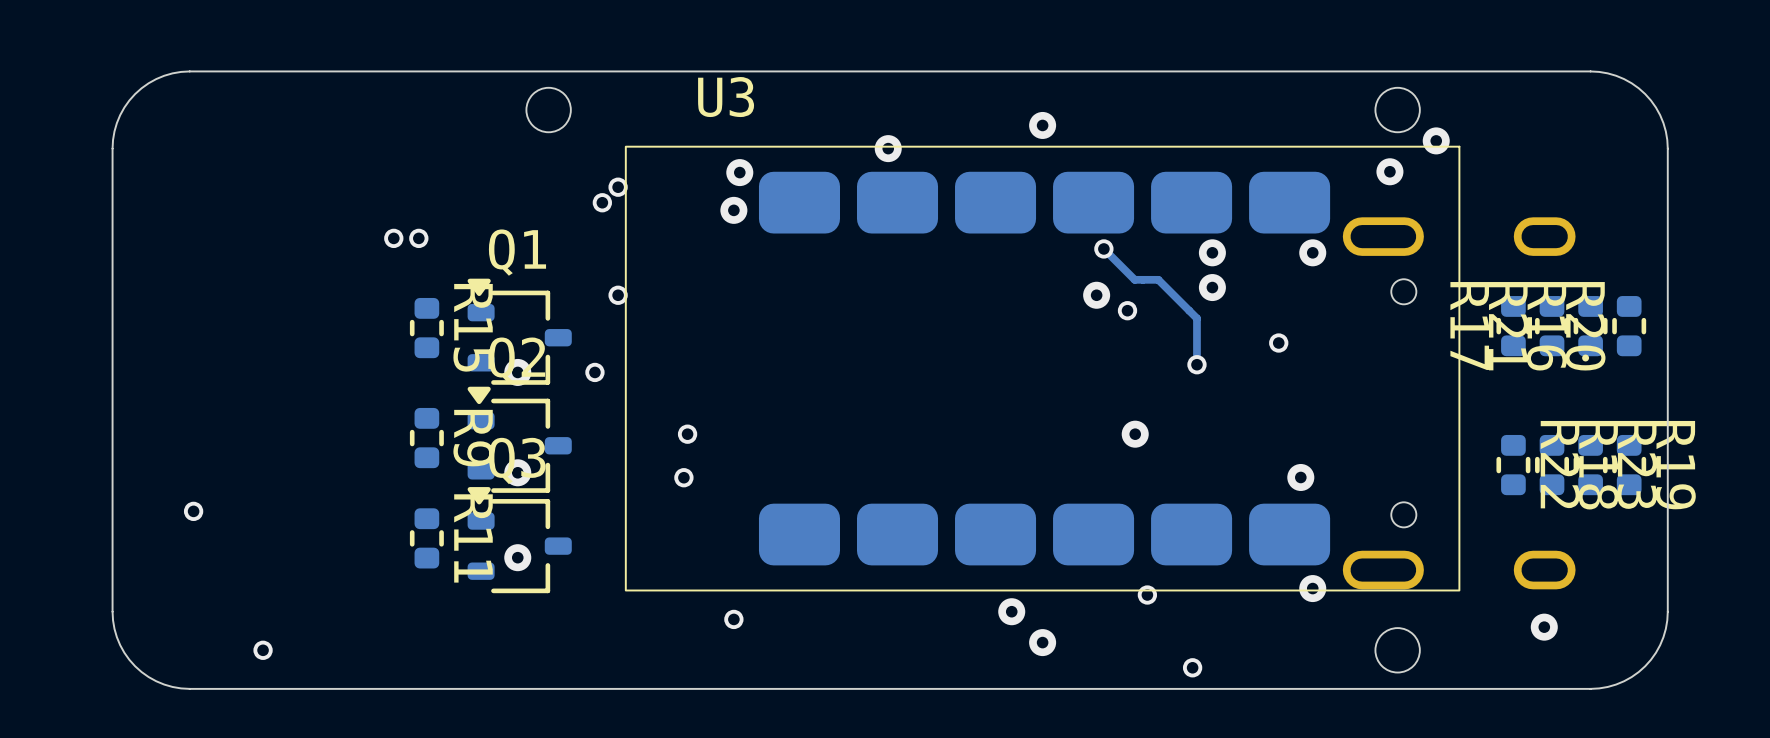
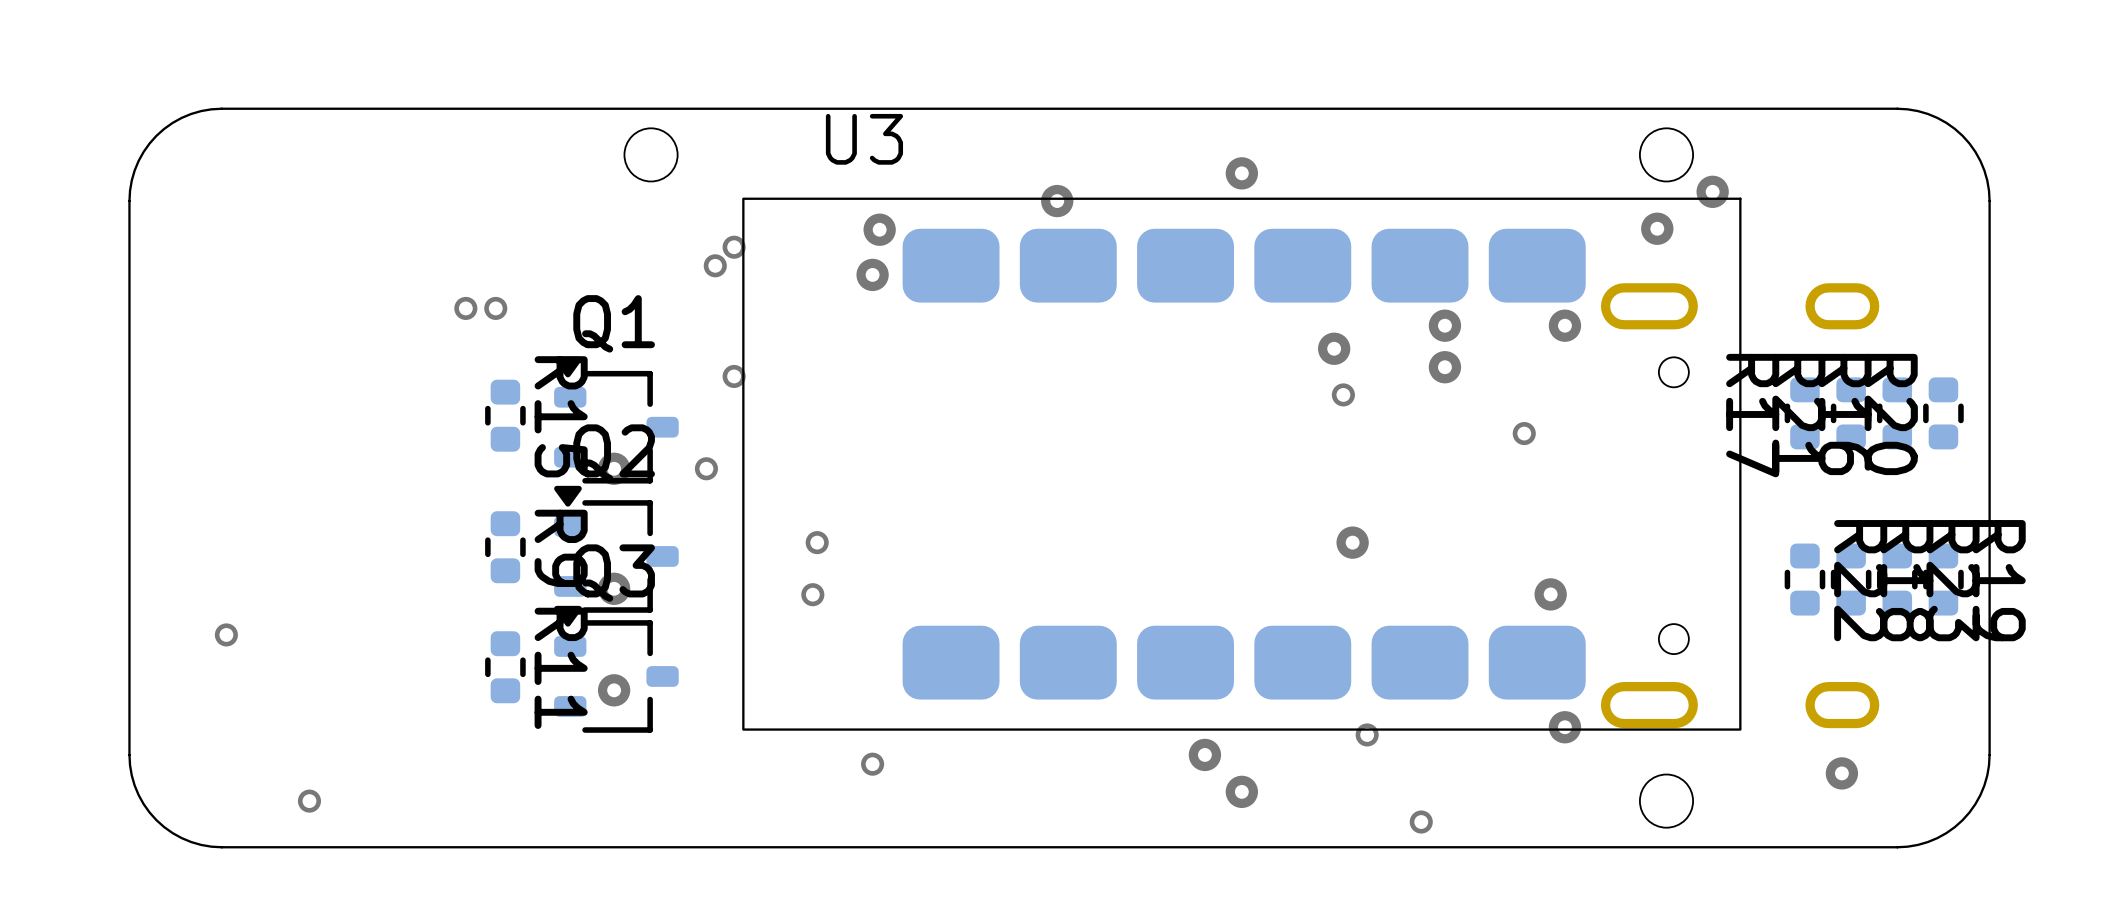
track: (1103, 248) (1134, 279) (1158, 279) (1196, 318) (1196, 364) -> none
via: (1103, 248) -> none
via position: (1096, 295) -> (1334, 348)
via: (1196, 364) -> none

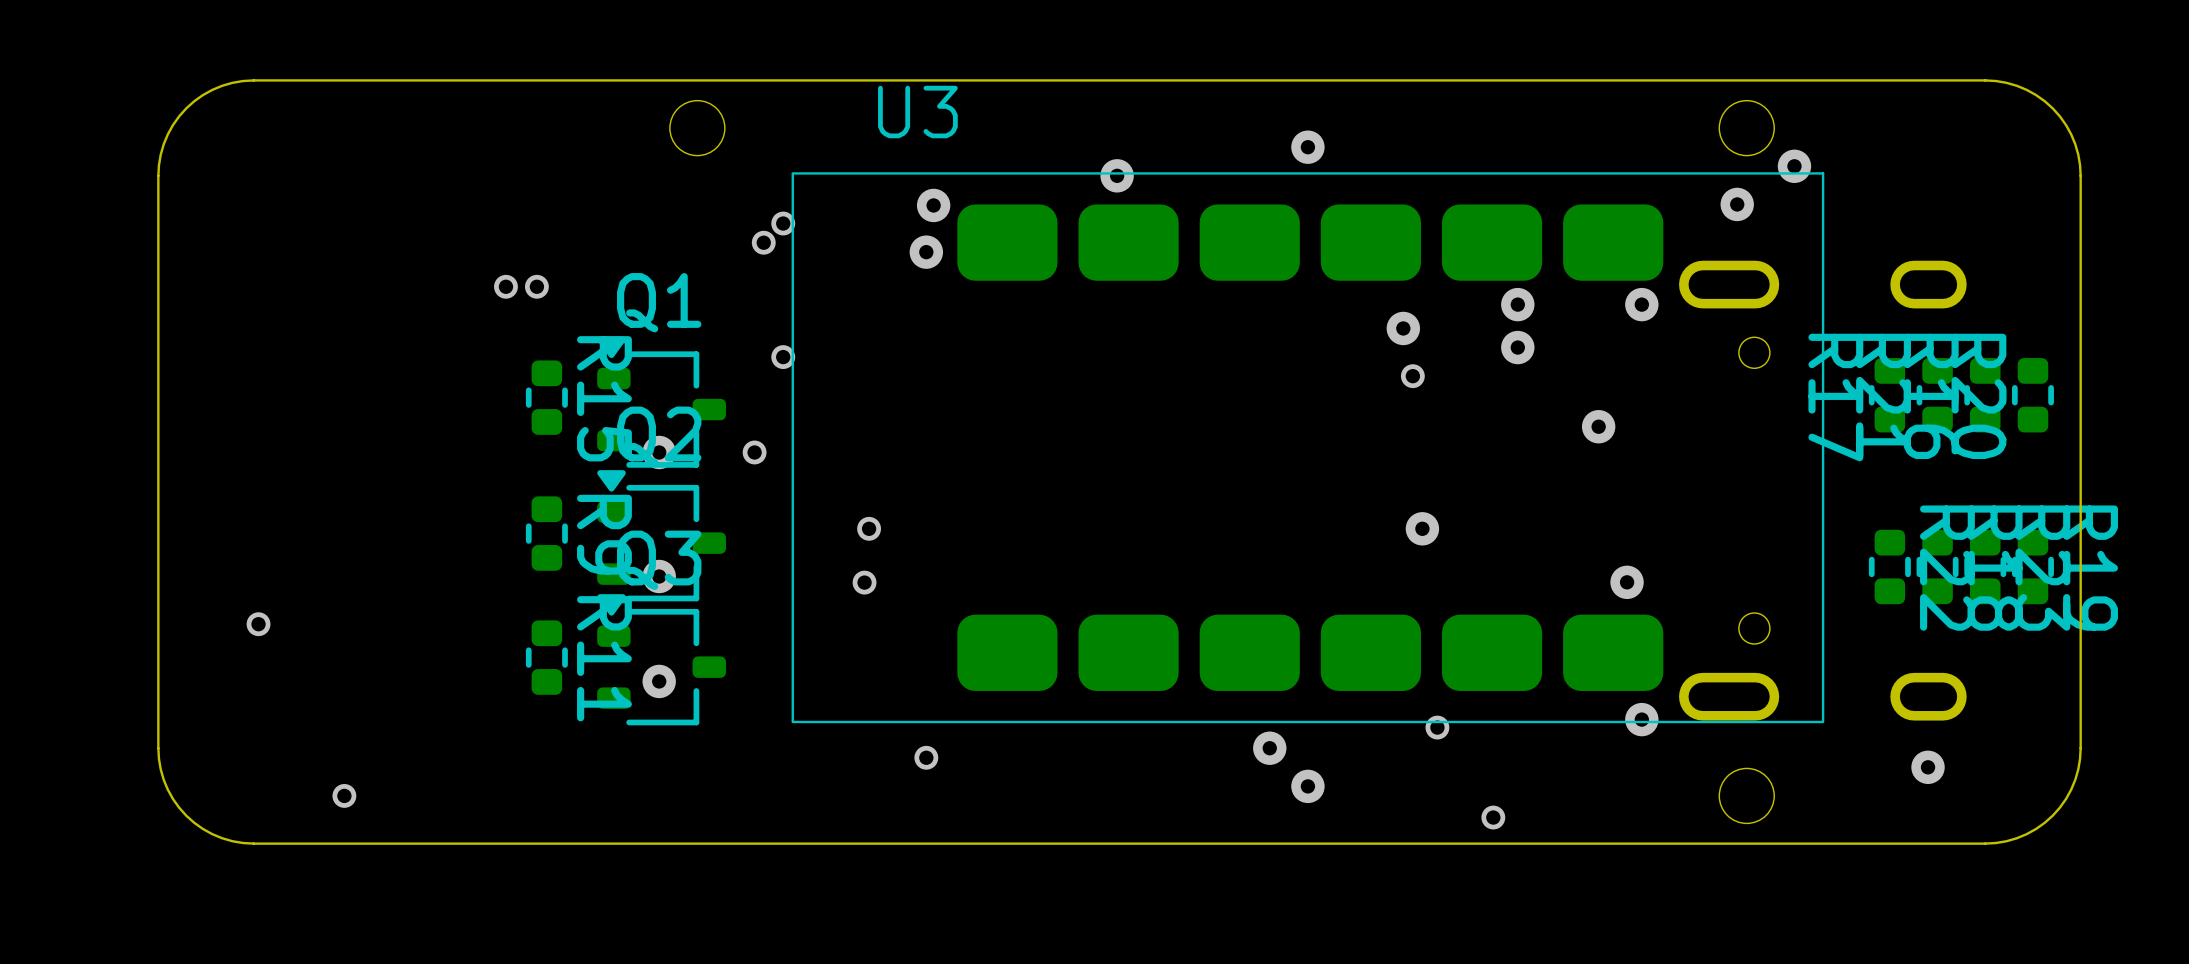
via size: [1512, 422, 1536, 446] -> [1581, 410, 1616, 444]

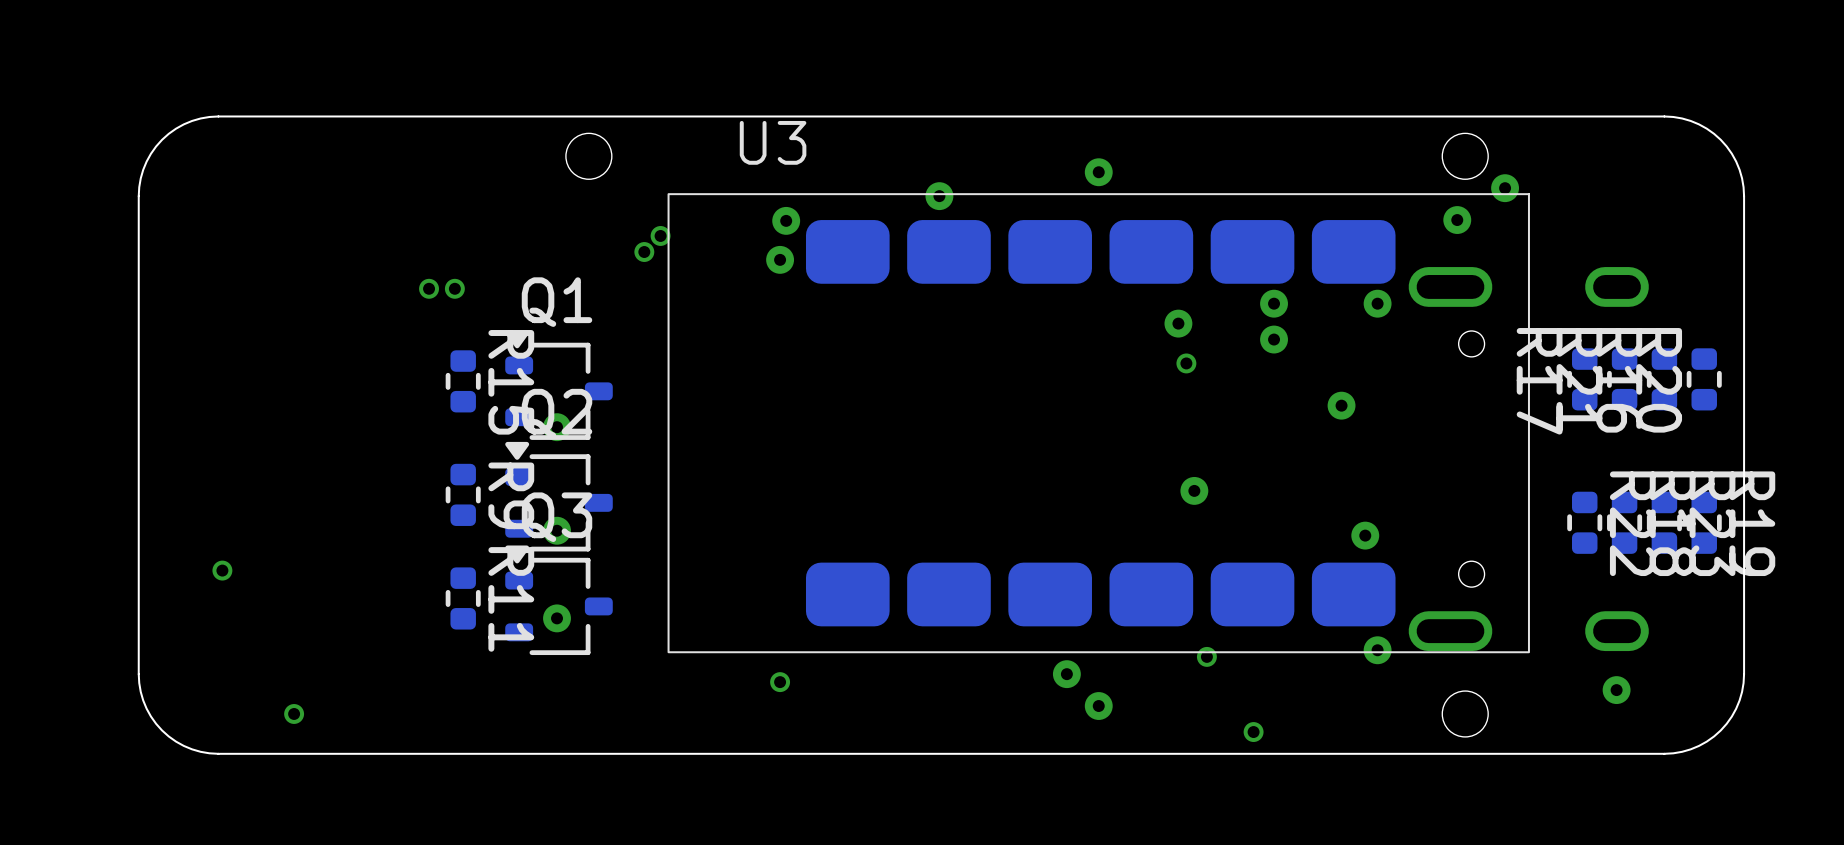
via: (783, 357) -> none
via: (754, 452) -> none
via: (869, 528) -> none
via: (864, 582) -> none

